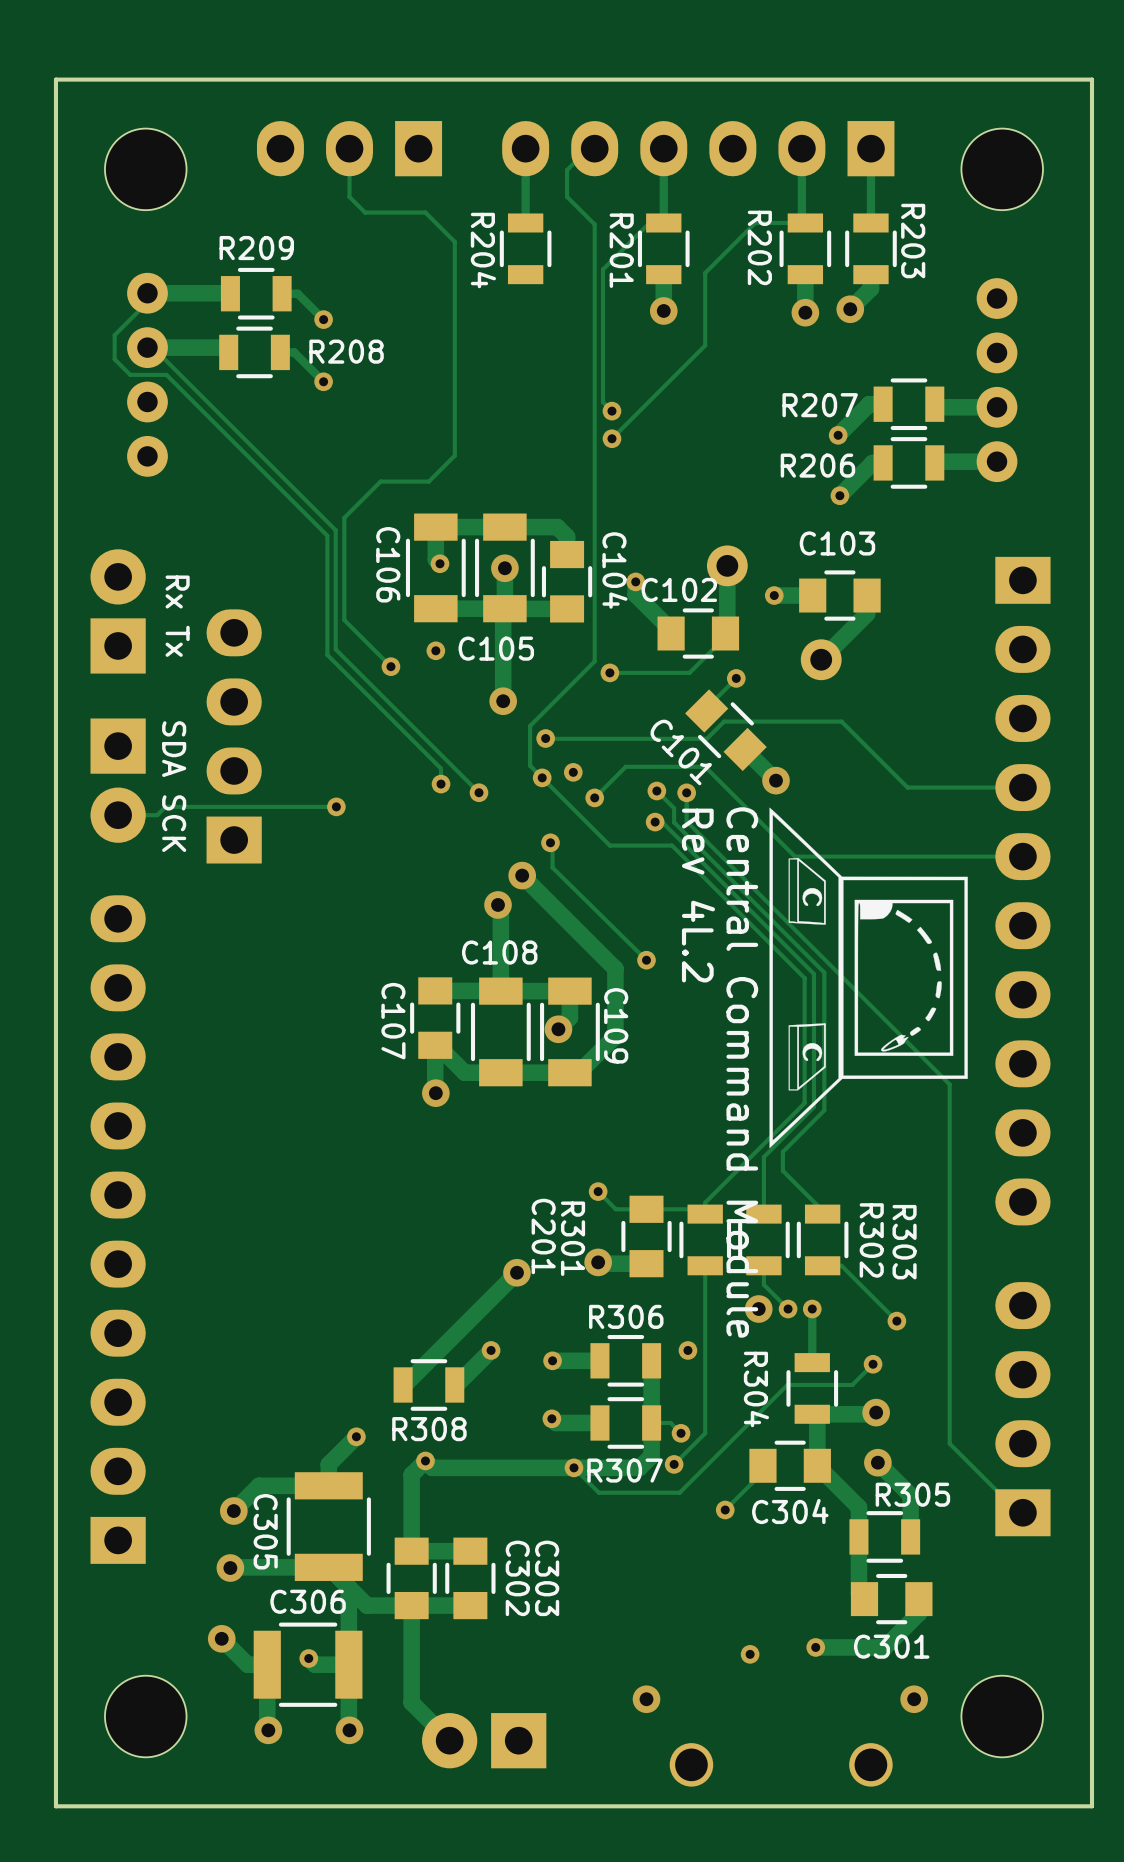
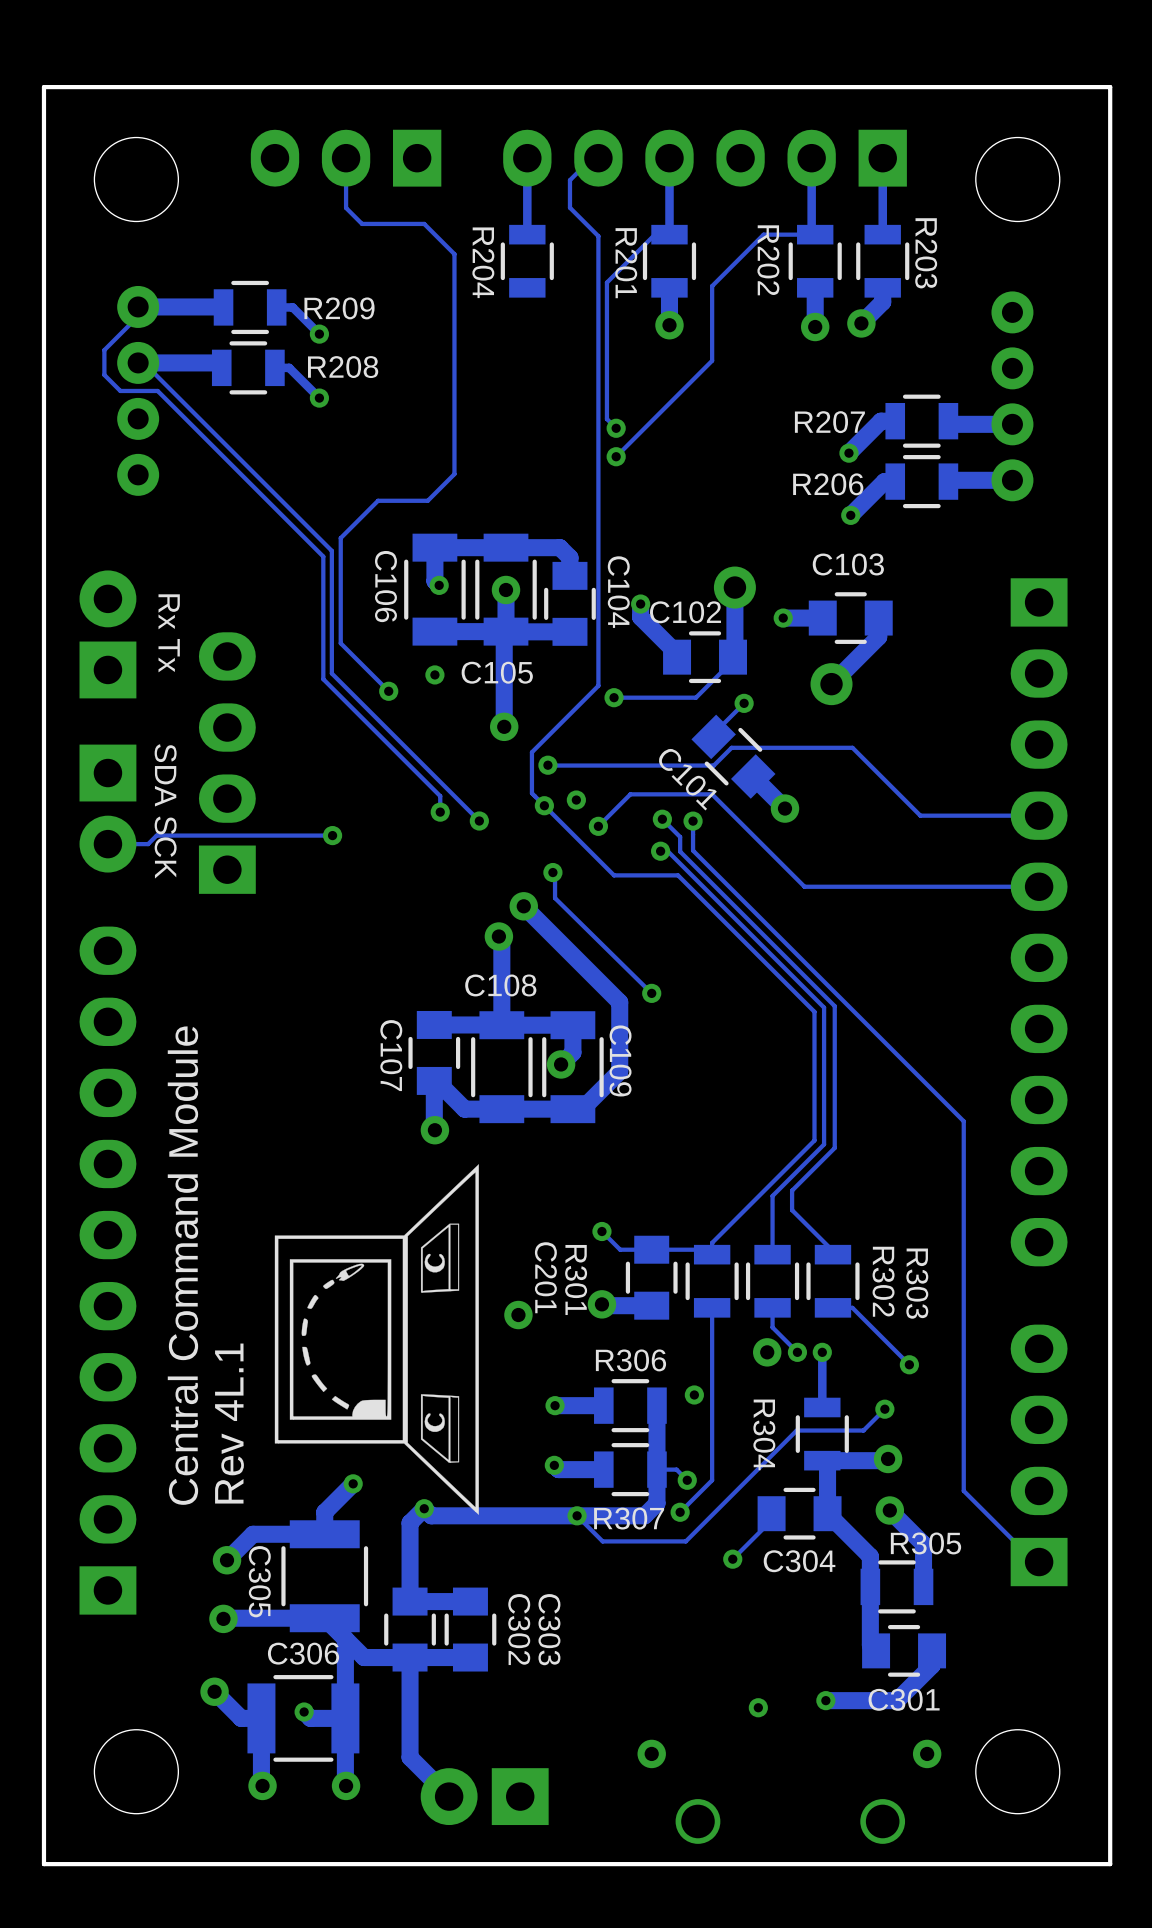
R209 name position: R209 (256, 248) -> R209 (339, 308)
drawing: [769, 807, 968, 1149] -> none
text: Rev 4L.2 (698, 895) -> none
text: Central Command Module (742, 1072) -> none
drawing: none -> [274, 1164, 479, 1515]
text: none -> Central Command Module (182, 1265)
track: (517, 1272) (403, 1384) -> none
track: (491, 1350) (454, 1384) -> none
via: (491, 1350) -> none
text: none -> Rev 4L.1 (229, 1423)
R308: (428, 1384) -> none

